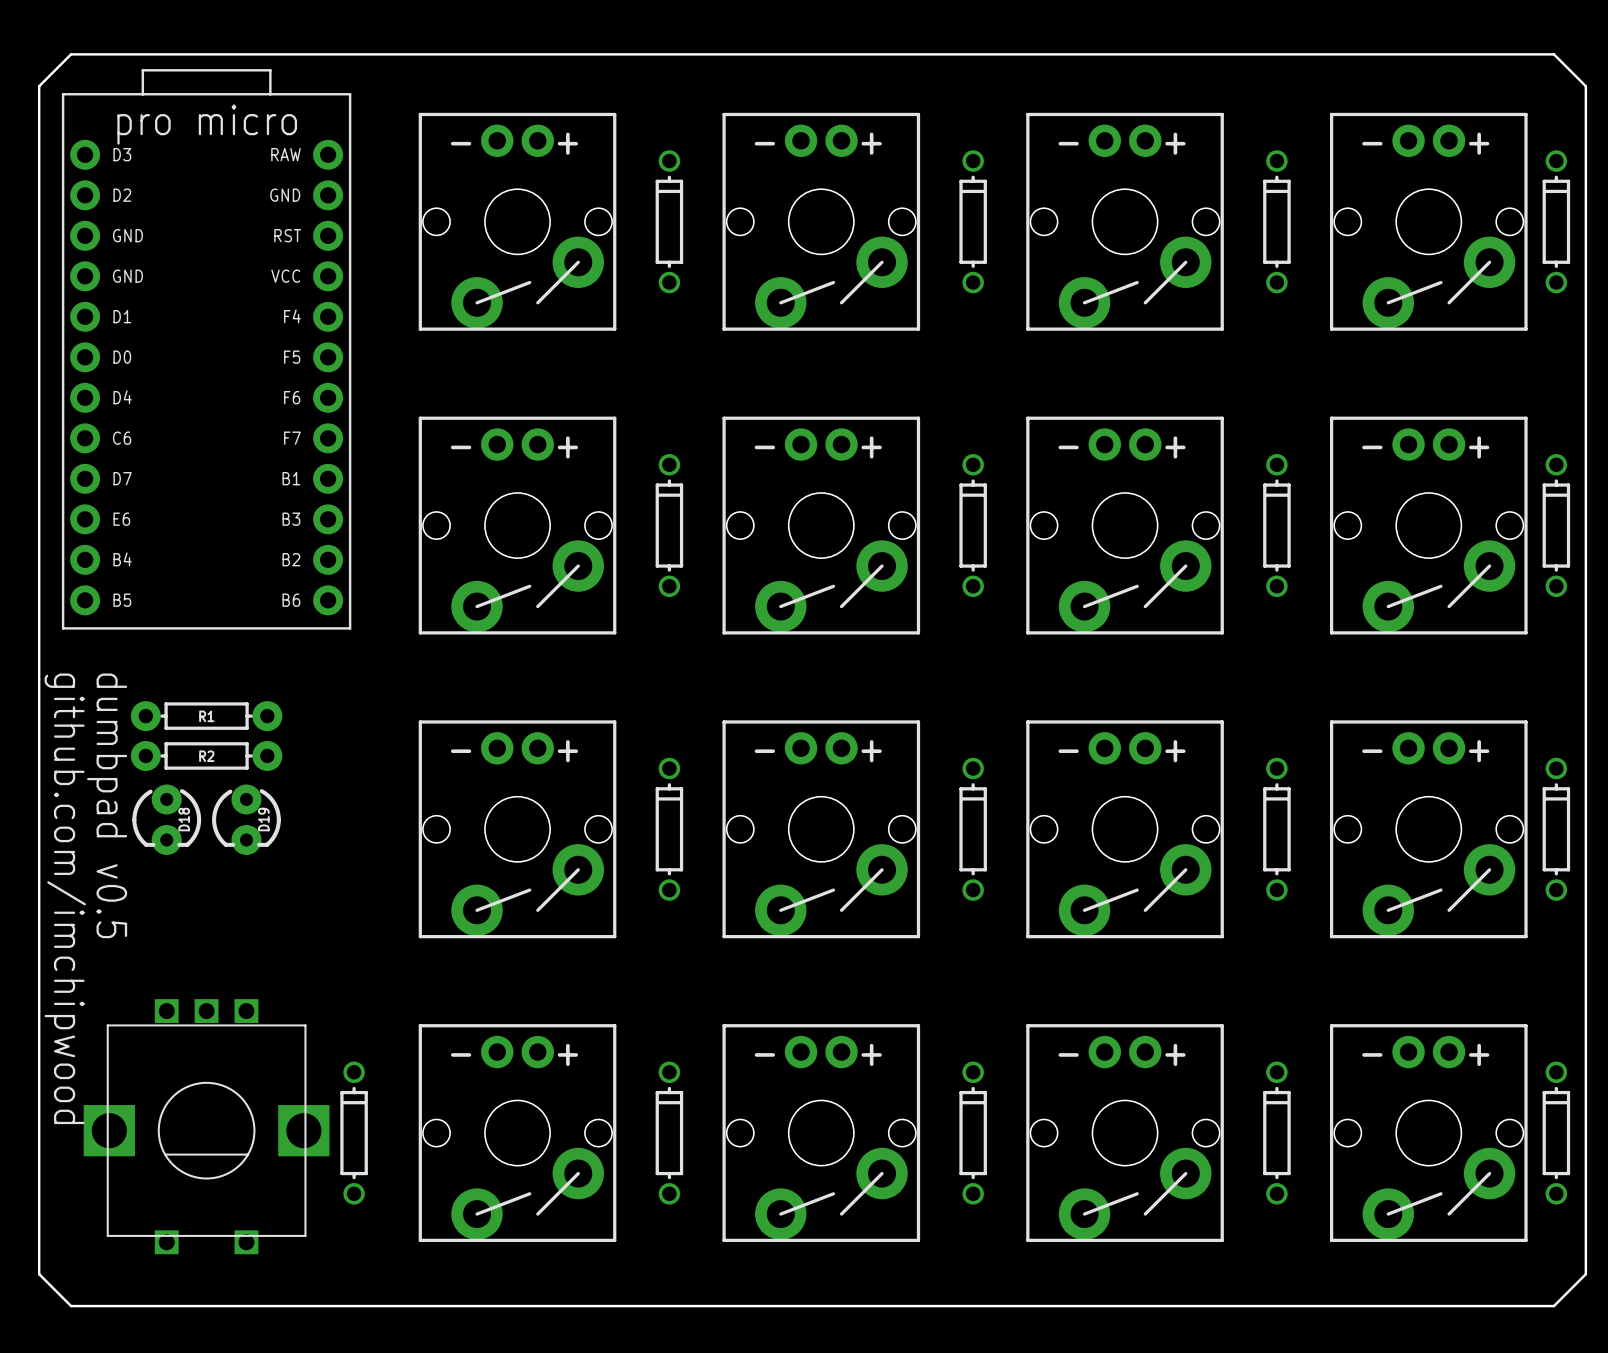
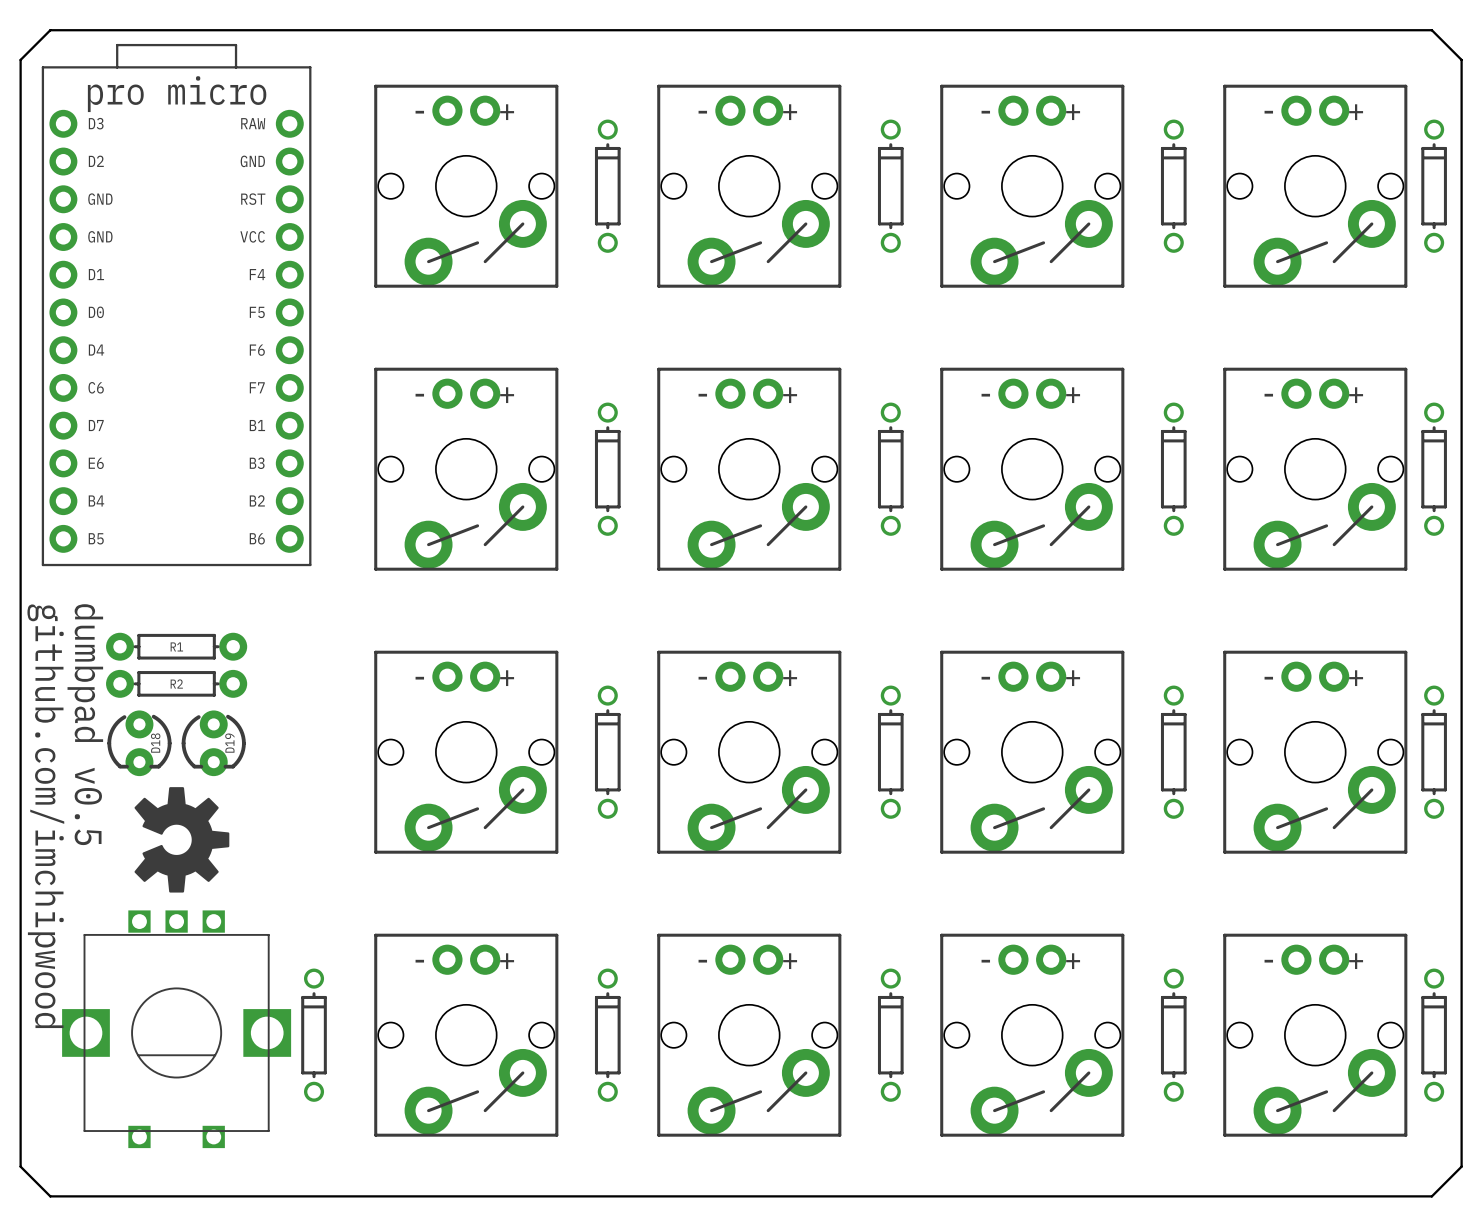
drawing: none -> [134, 787, 230, 893]

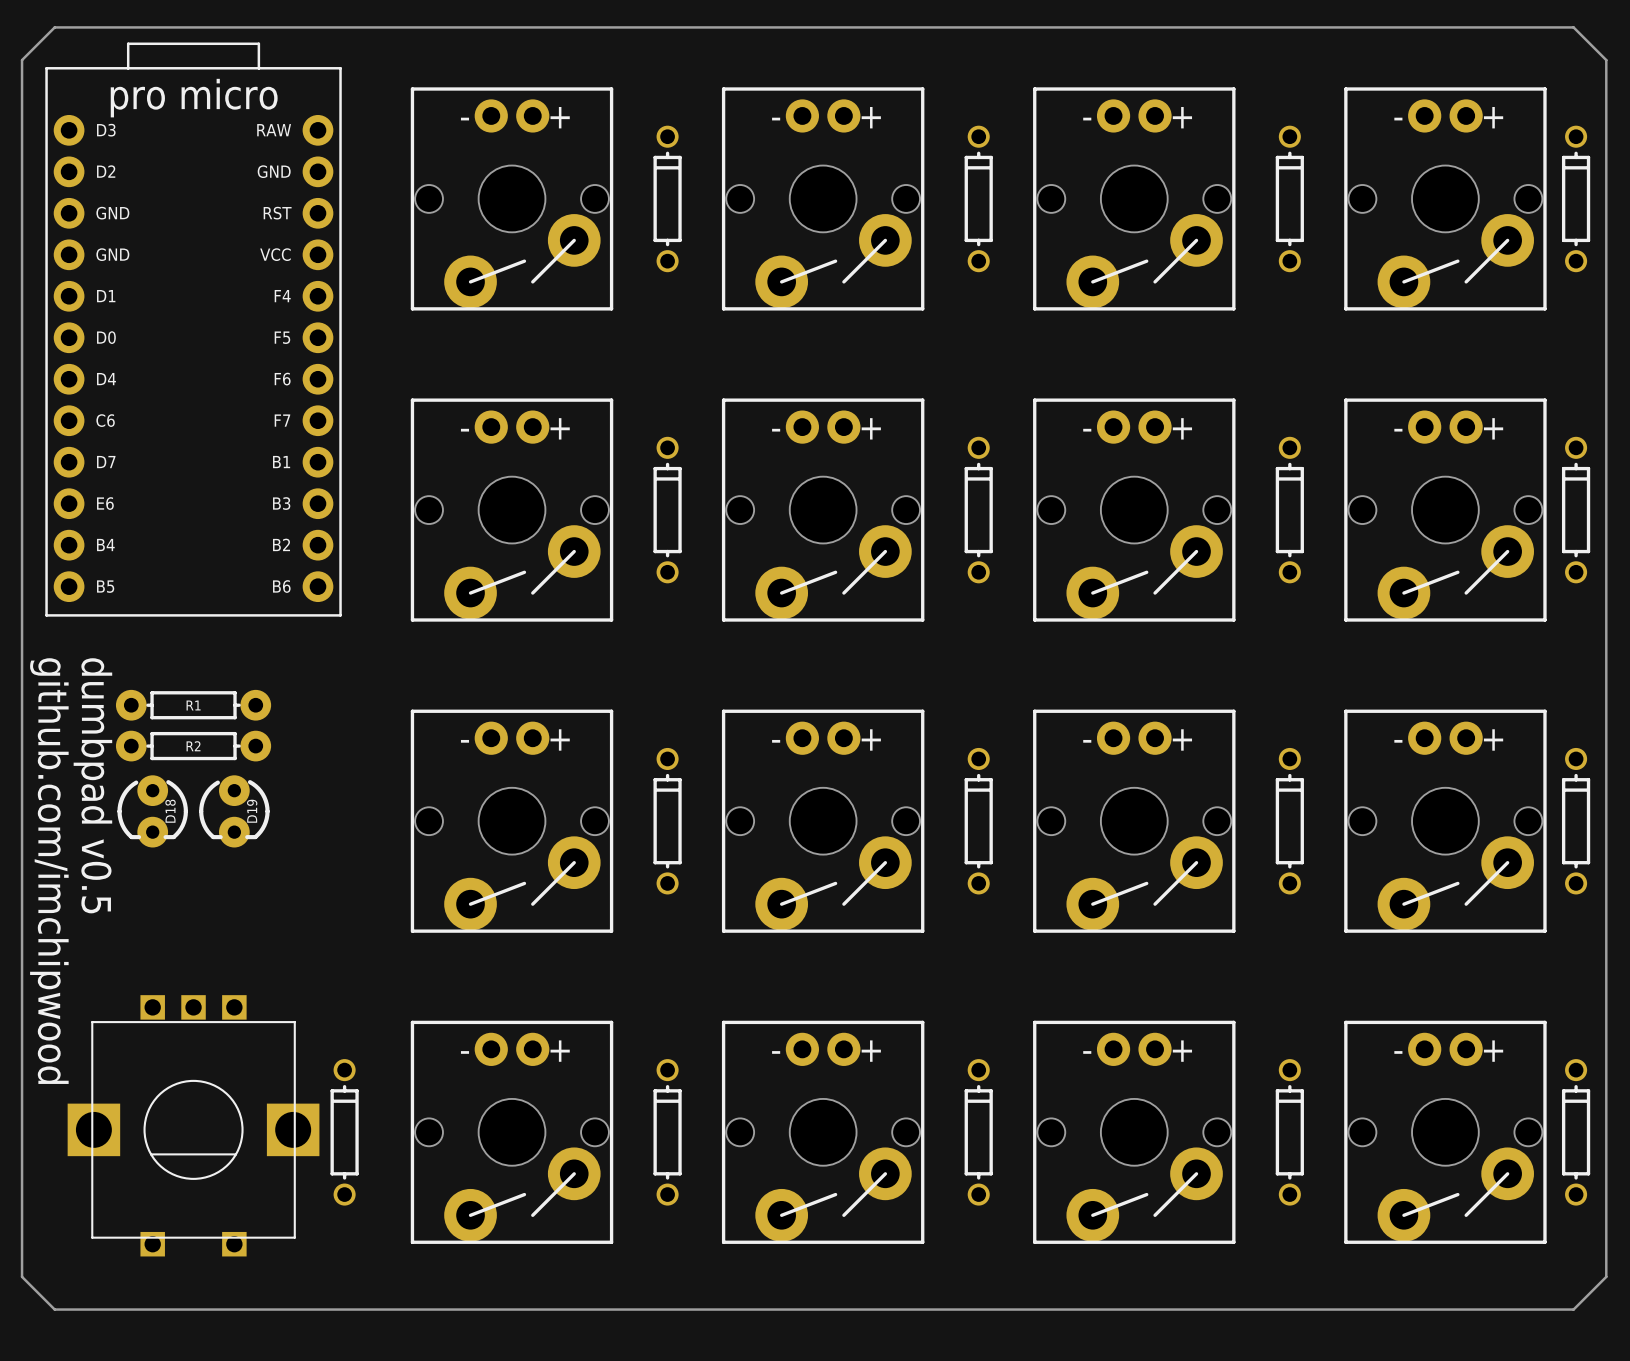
drawing: [134, 787, 230, 893] -> none

